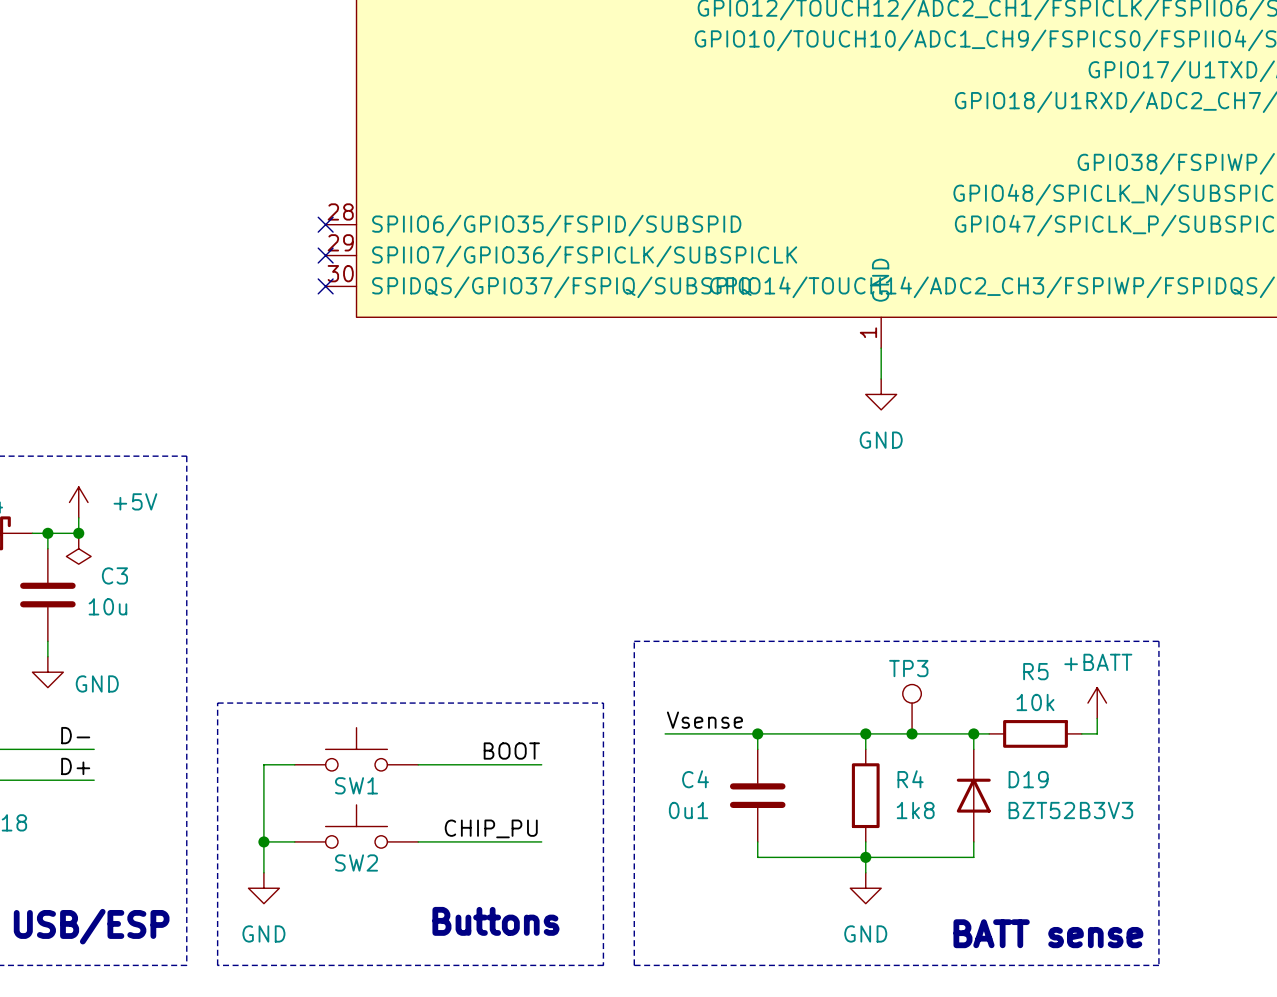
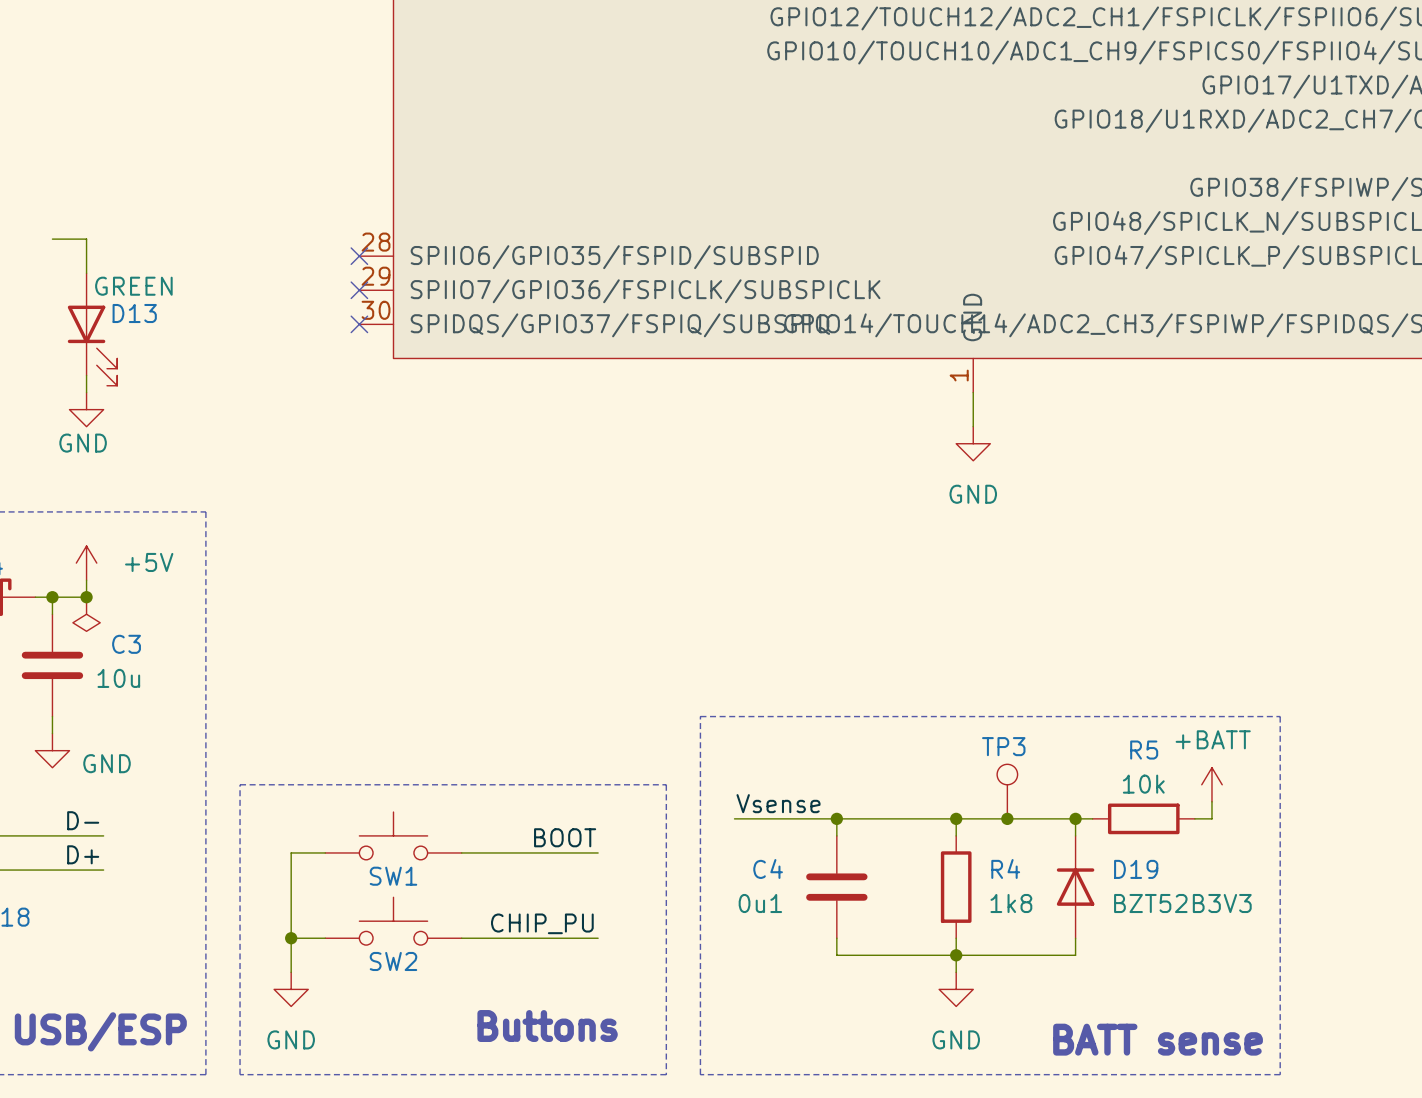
wire: none -> (52, 239) (86, 239) (86, 273)
D13: none -> GREEN (92, 329)
wire: none -> (86, 375) (86, 392)
power symbol: none -> GND (86, 409)

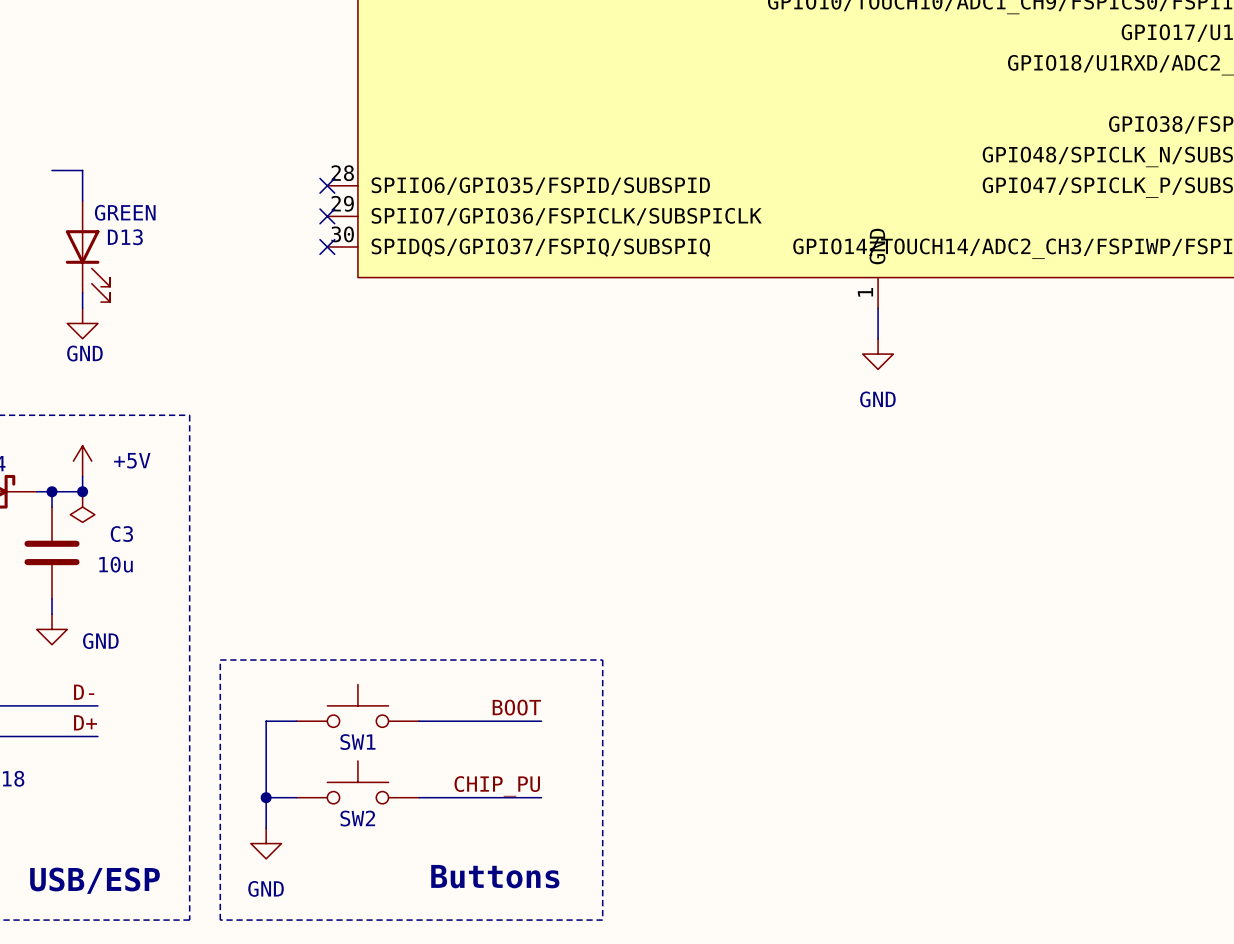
line: (700, 716) (1280, 716) (1280, 1074) (700, 1074) (700, 716) -> none
power symbol: +BATT (1211, 784) -> none
TP3: (1007, 791) -> none
wire: (1211, 801) (1211, 818) (1194, 818) -> none
label: Vsense (778, 803) -> none
wire: (734, 818) (1092, 818) -> none
wire: (836, 818) (836, 835) -> none
junction: (836, 818) -> none
wire: (956, 818) (956, 835) -> none
junction: (956, 818) -> none
junction: (1007, 818) -> none
wire: (1075, 818) (1075, 835) -> none
junction: (1075, 818) -> none
R5: 10k (1143, 818) -> none
C4: 0u1 (836, 887) -> none
R4: 1k8 (956, 887) -> none
D19: BZT52B3V3 (1075, 887) -> none
wire: (836, 938) (836, 955) (1075, 955) (1075, 938) -> none
wire: (956, 938) (956, 972) -> none
junction: (956, 955) -> none
power symbol: GND (956, 989) -> none
text: BATT sense (1158, 1039) -> none

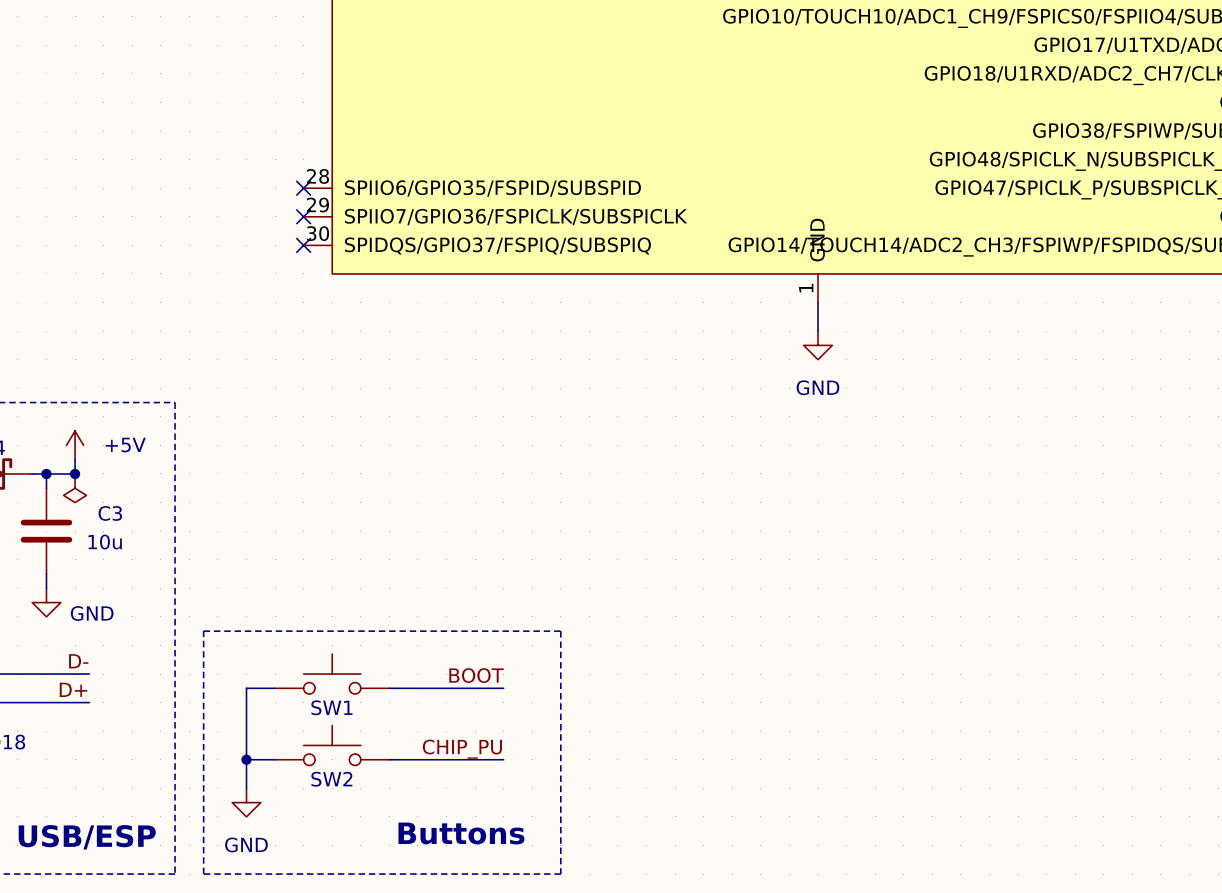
wire: (52, 170) (82, 170) (82, 201) -> none
D13: GREEN (87, 251) -> none
wire: (82, 292) (82, 308) -> none
power symbol: GND (82, 323) -> none

